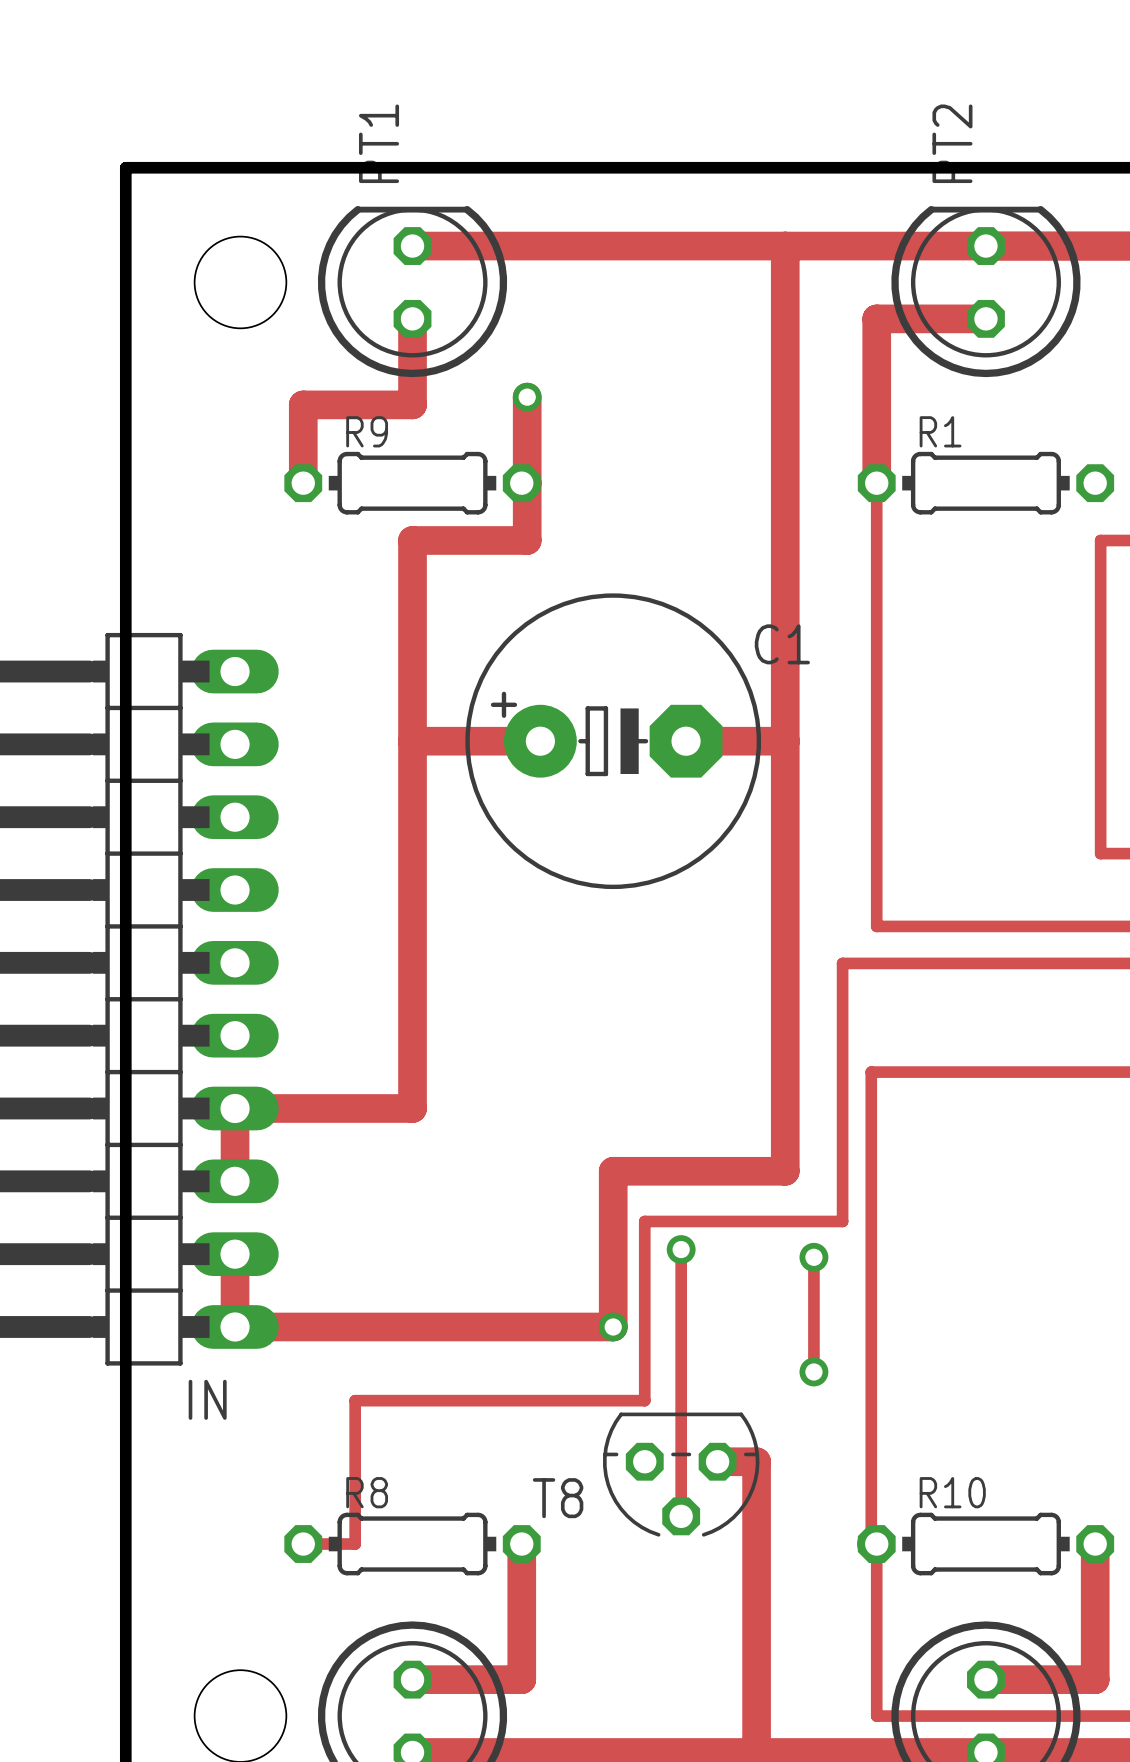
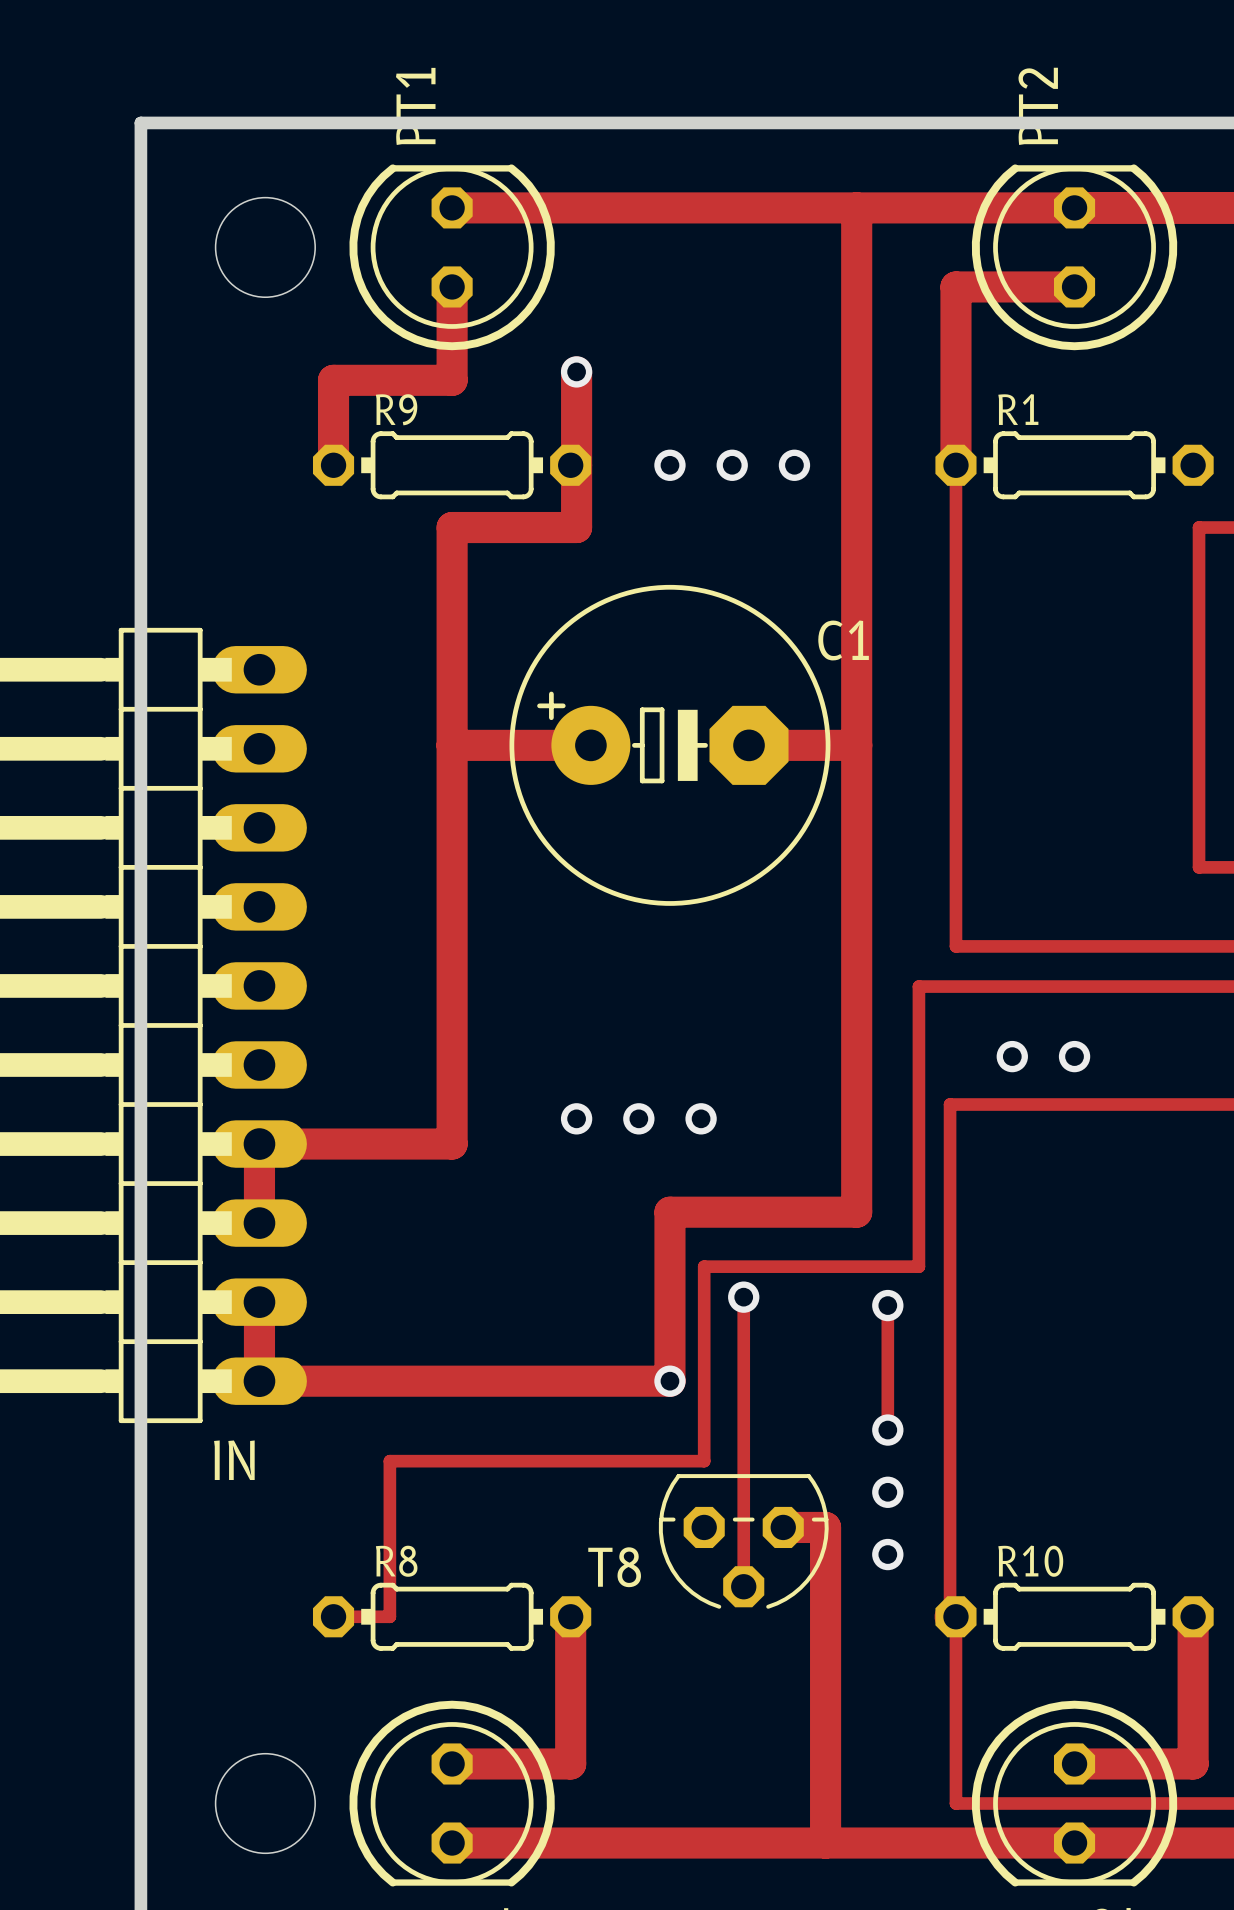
via: none -> (669, 465)
via: none -> (732, 465)
via: none -> (794, 465)
via: none -> (1012, 1056)
via: none -> (1074, 1056)
via: none -> (576, 1118)
via: none -> (638, 1118)
via: none -> (701, 1118)
via: none -> (887, 1492)
via: none -> (887, 1554)

